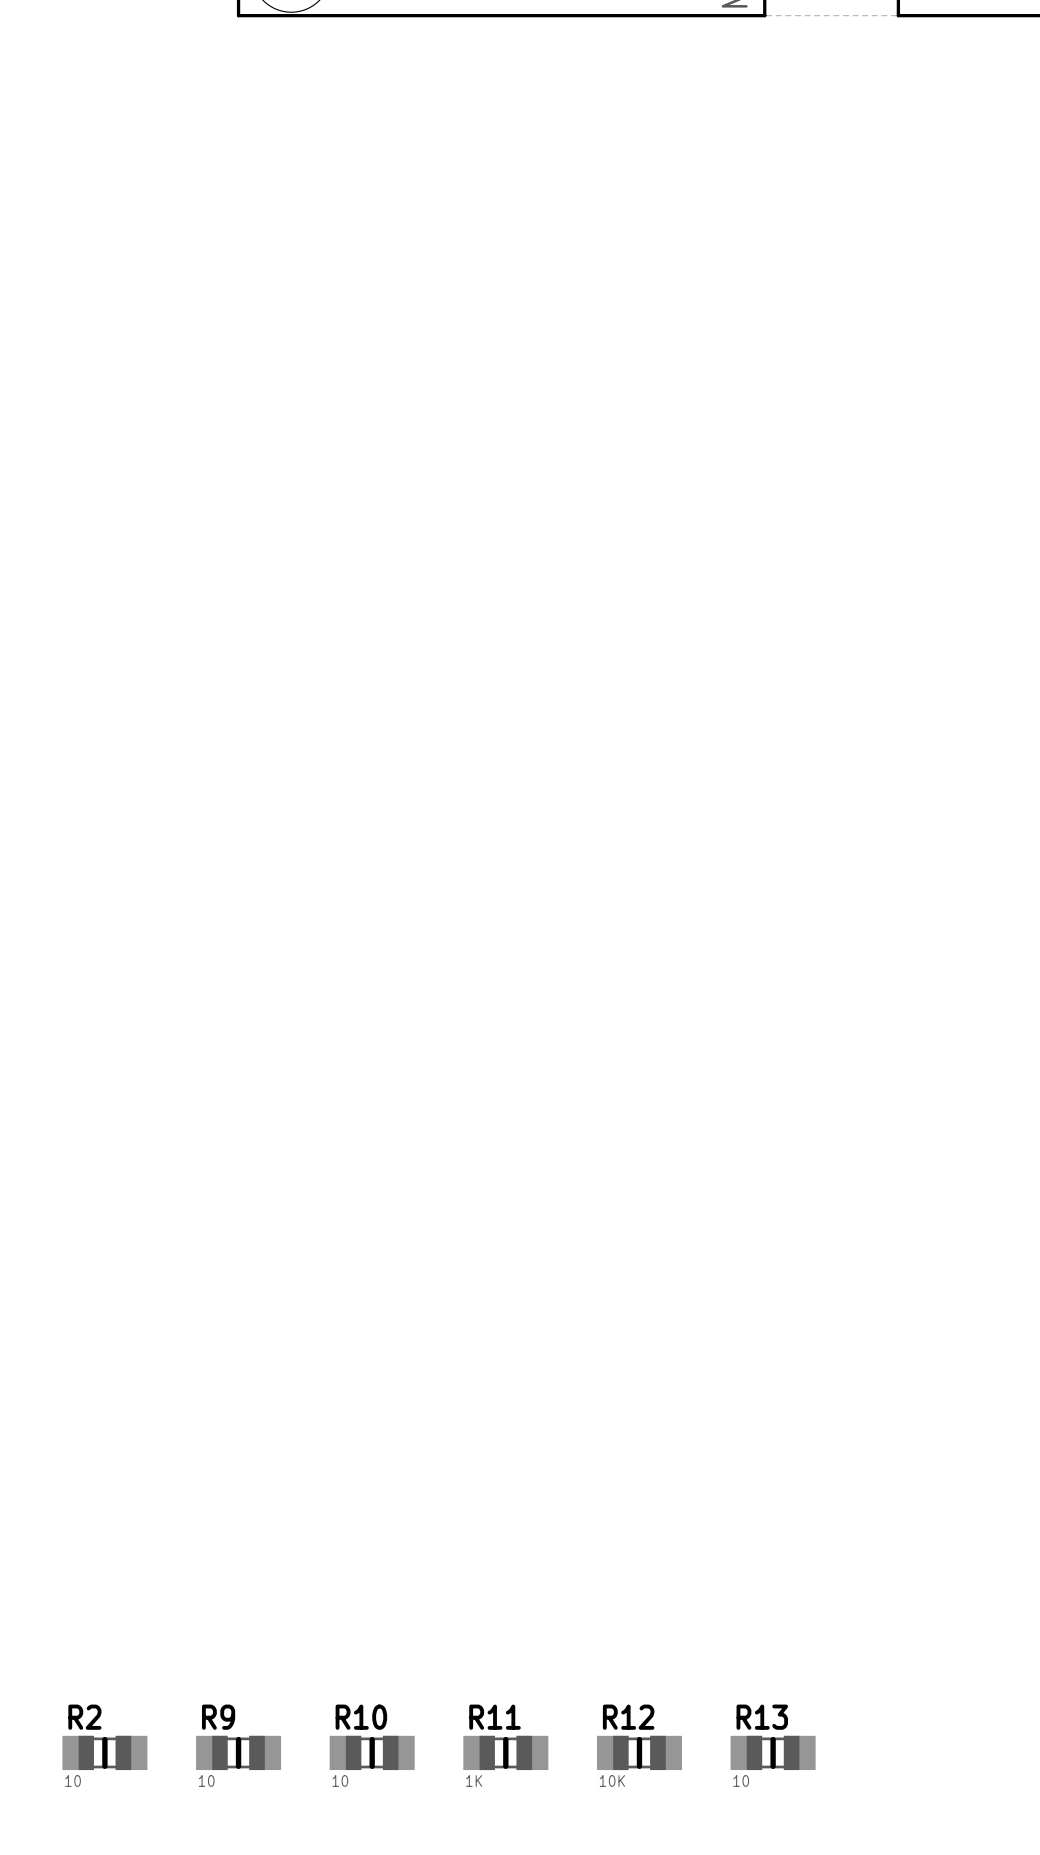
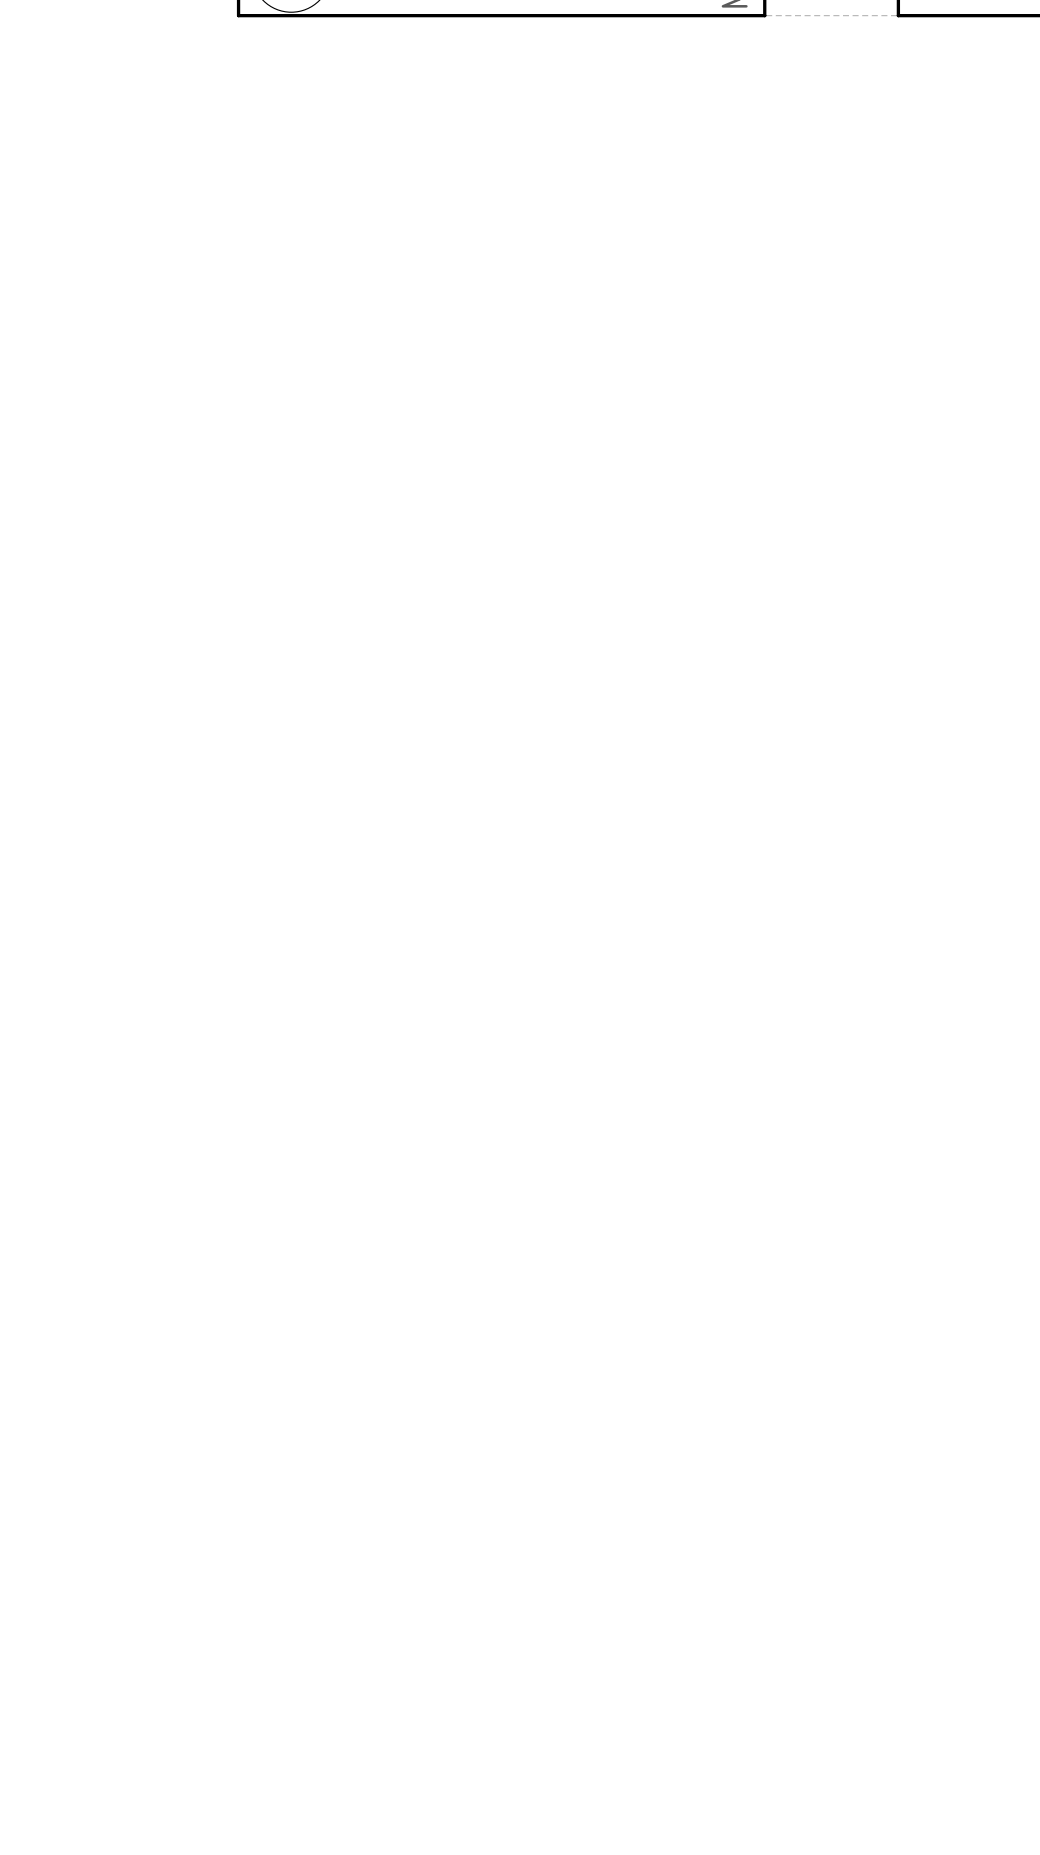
R2: 10 (104, 1752) -> none
R9: 10 (238, 1752) -> none
R10: 10 (372, 1752) -> none
R11: 1K (505, 1752) -> none
R12: 10K (639, 1752) -> none
R13: 10 (773, 1752) -> none

